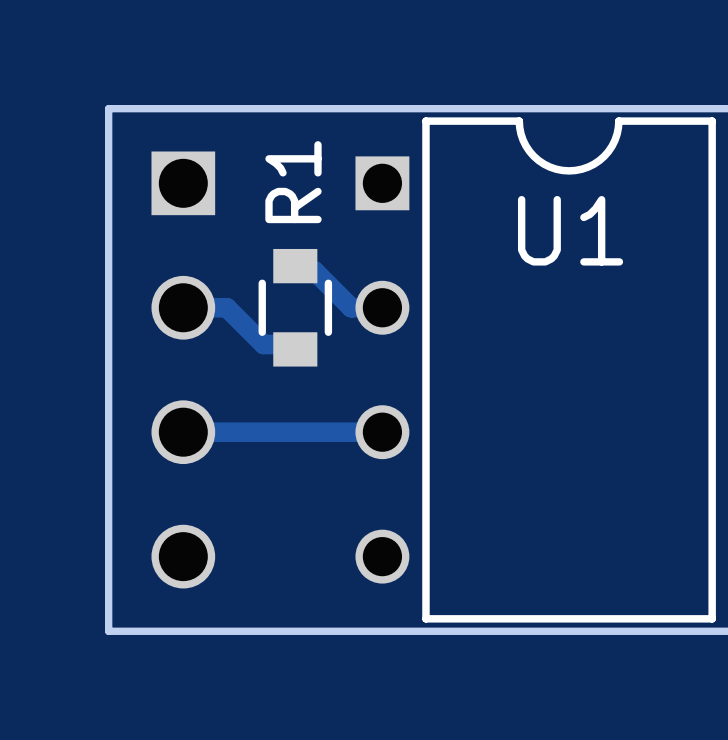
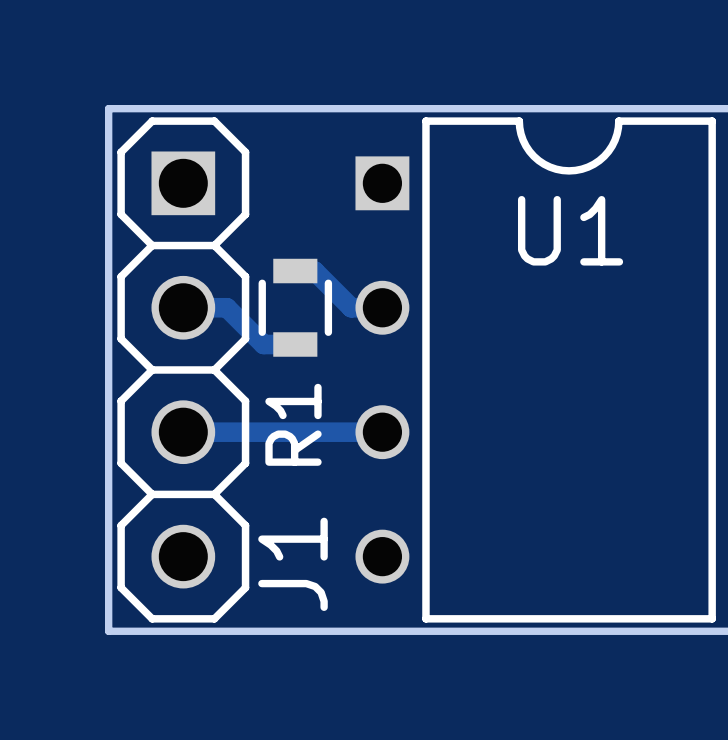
R1 name position: R1 (293, 182) -> R1 (293, 424)
R1 footprint: [258, 248, 333, 367] -> [258, 258, 333, 357]
J1 side: bottom (183, 369) -> top (183, 369)

